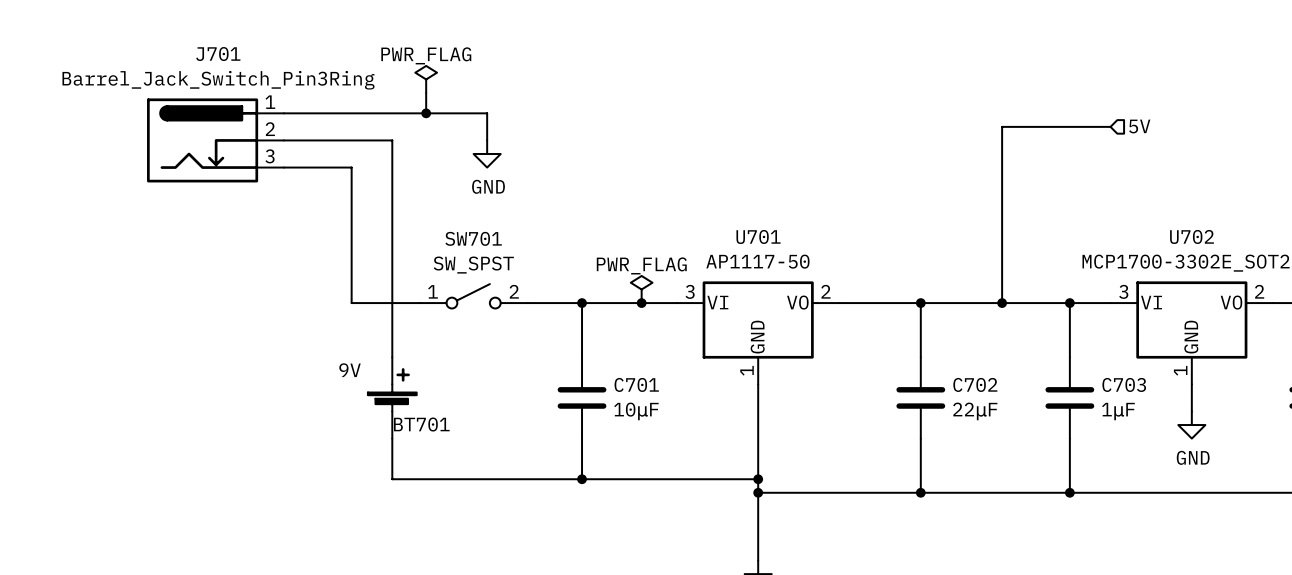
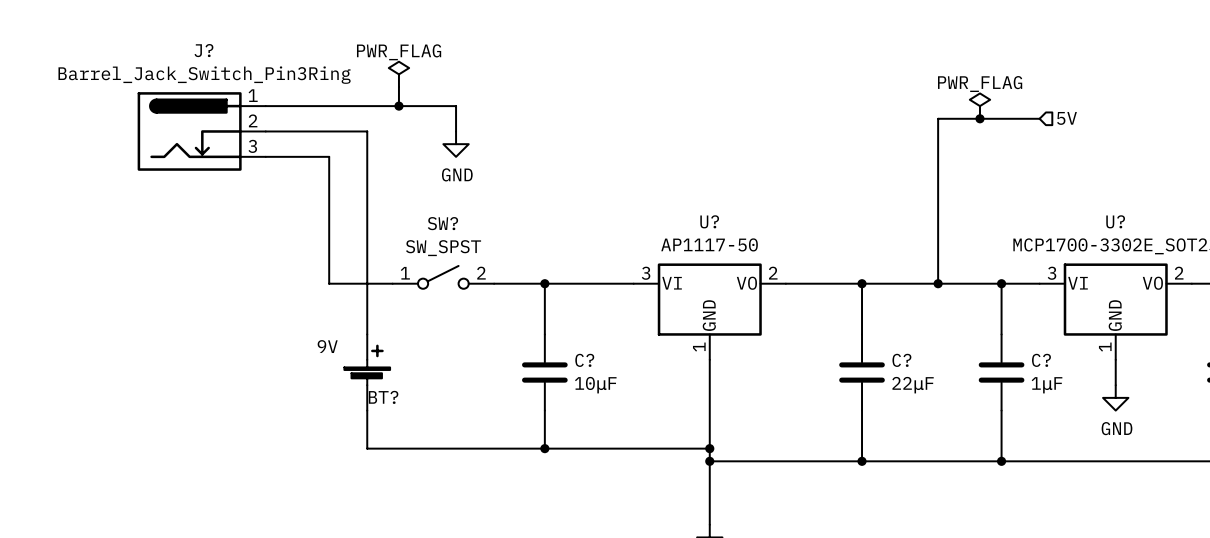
J701 name: J701 (218, 54) -> J? (203, 50)
power symbol: none -> PWR_FLAG (979, 106)
junction: none -> (979, 118)
U701 name: U701 (758, 236) -> U? (709, 221)
U702 name: U702 (1192, 236) -> U? (1115, 221)
SW701 name: SW701 (473, 238) -> SW? (442, 223)
power symbol: PWR_FLAG (641, 289) -> none
junction: (641, 303) -> none
C701 name: C701 (636, 384) -> C? (584, 360)
C702 name: C702 (975, 384) -> C? (901, 360)
C703 name: C703 (1124, 384) -> C? (1041, 360)
BT701 name: BT701 (421, 424) -> BT? (383, 397)

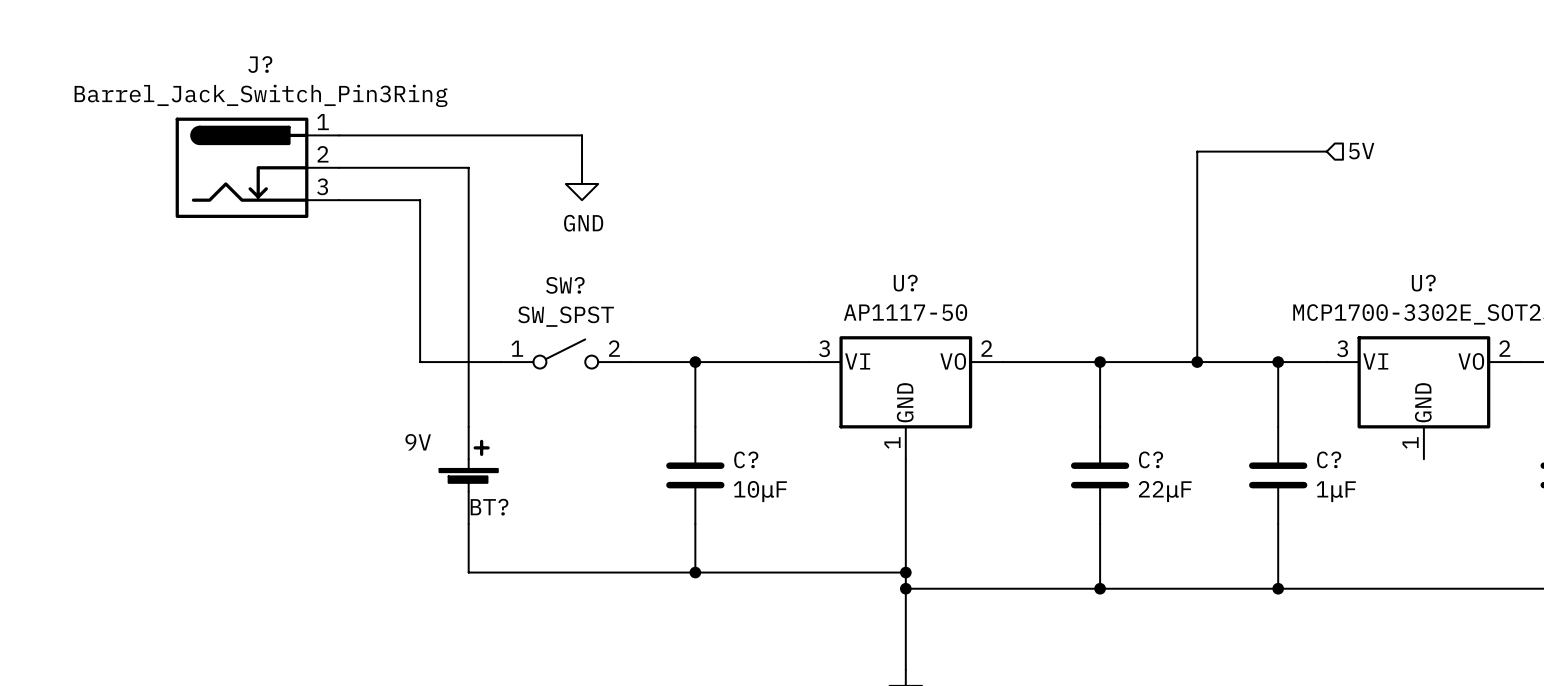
power symbol: PWR_FLAG (398, 74) -> none
wire: (398, 87) (398, 106) -> none
junction: (398, 106) -> none
power symbol: PWR_FLAG (979, 106) -> none
junction: (979, 118) -> none
wire: (1115, 359) (1115, 385) -> none
power symbol: GND (1115, 397) -> none

